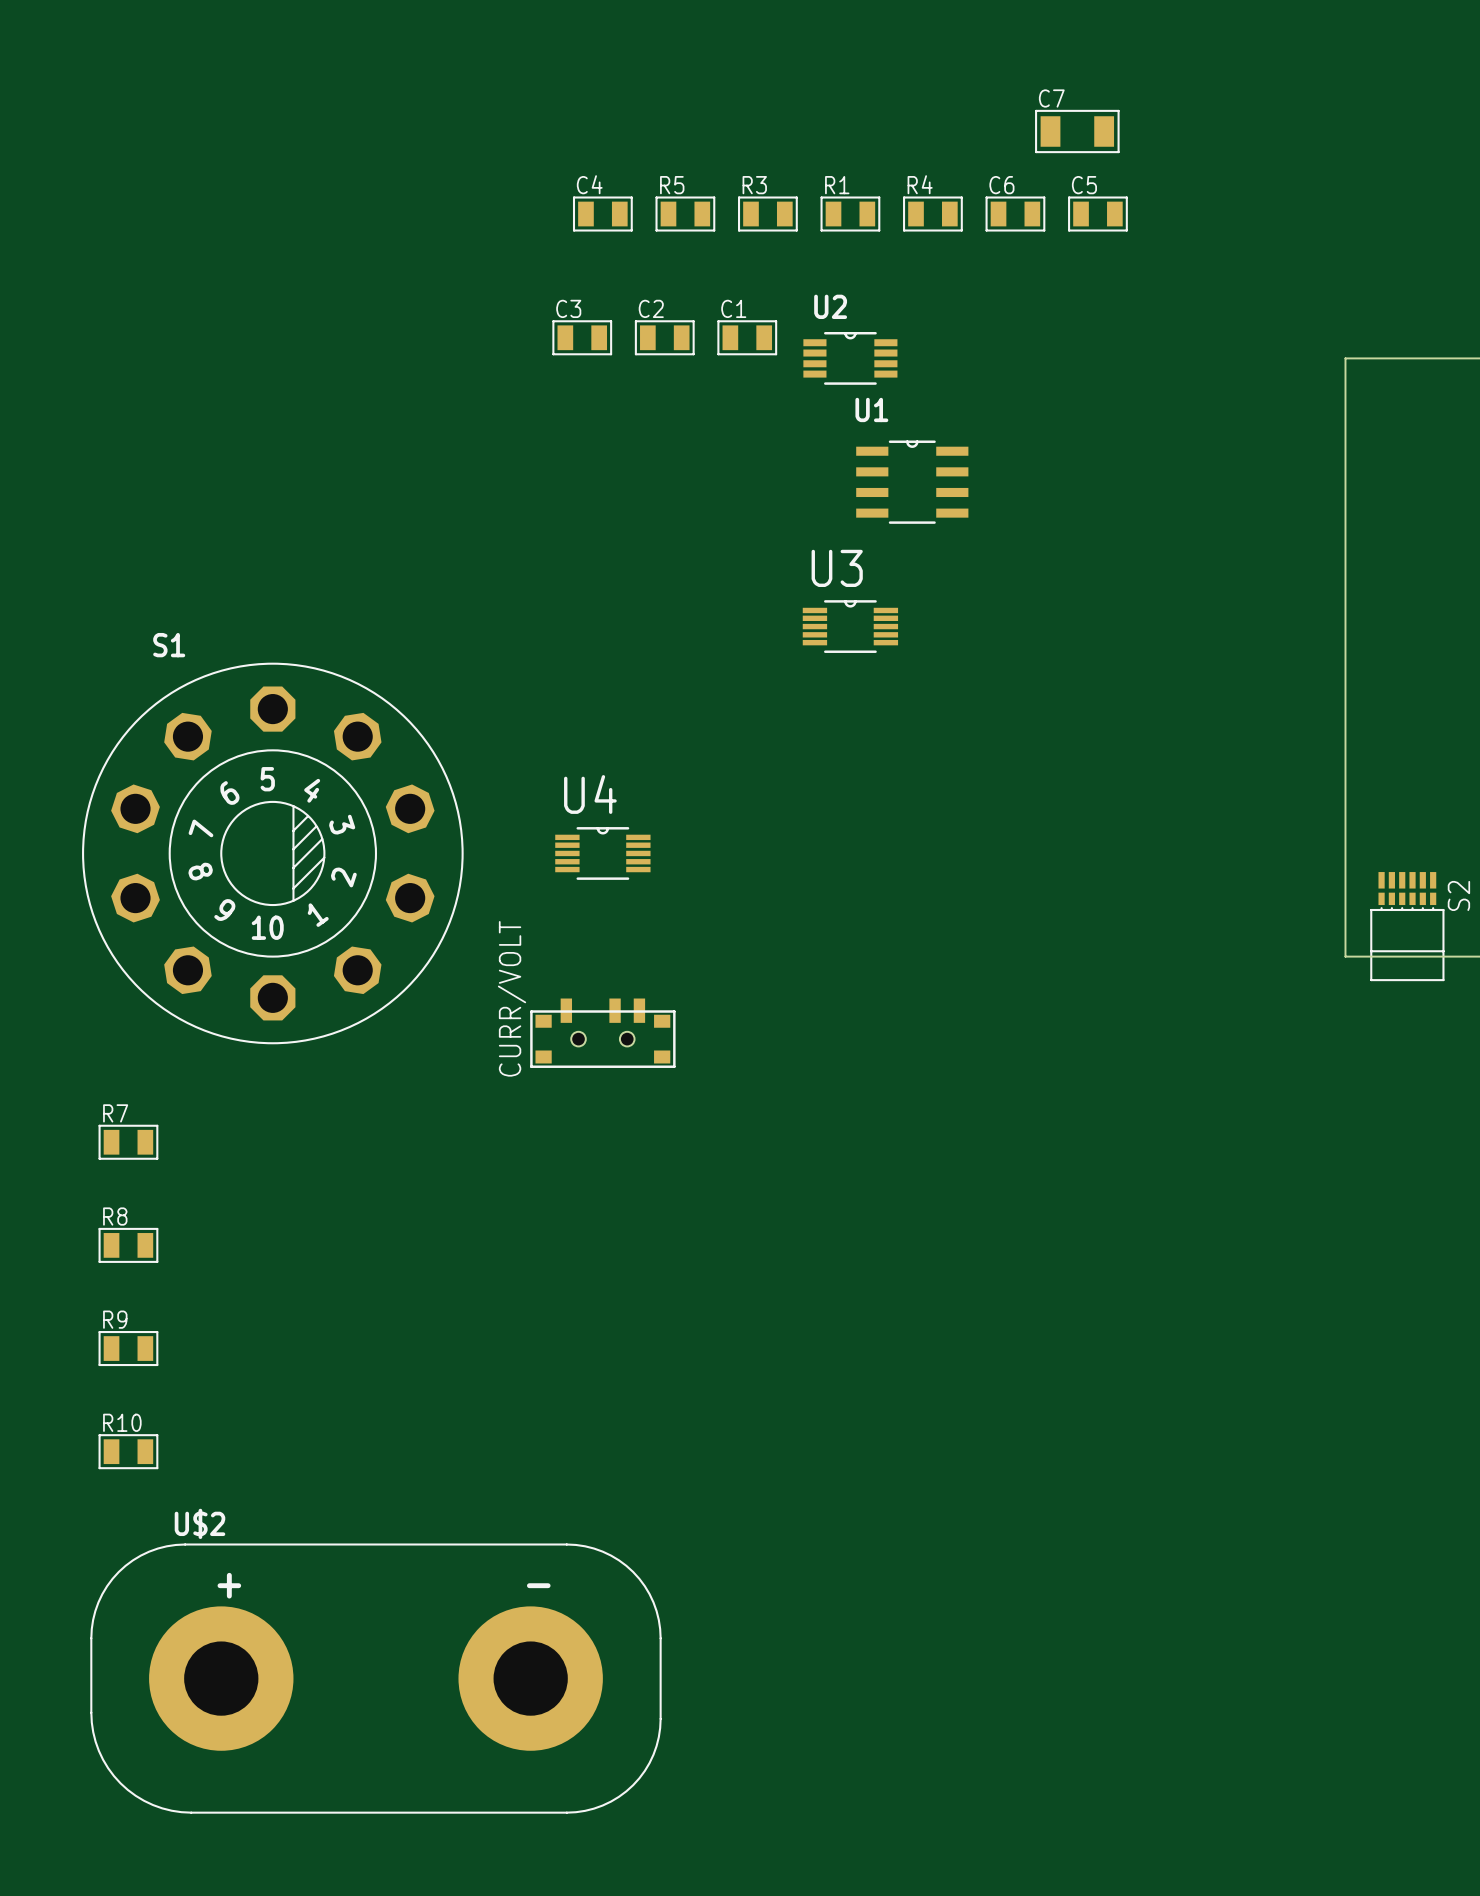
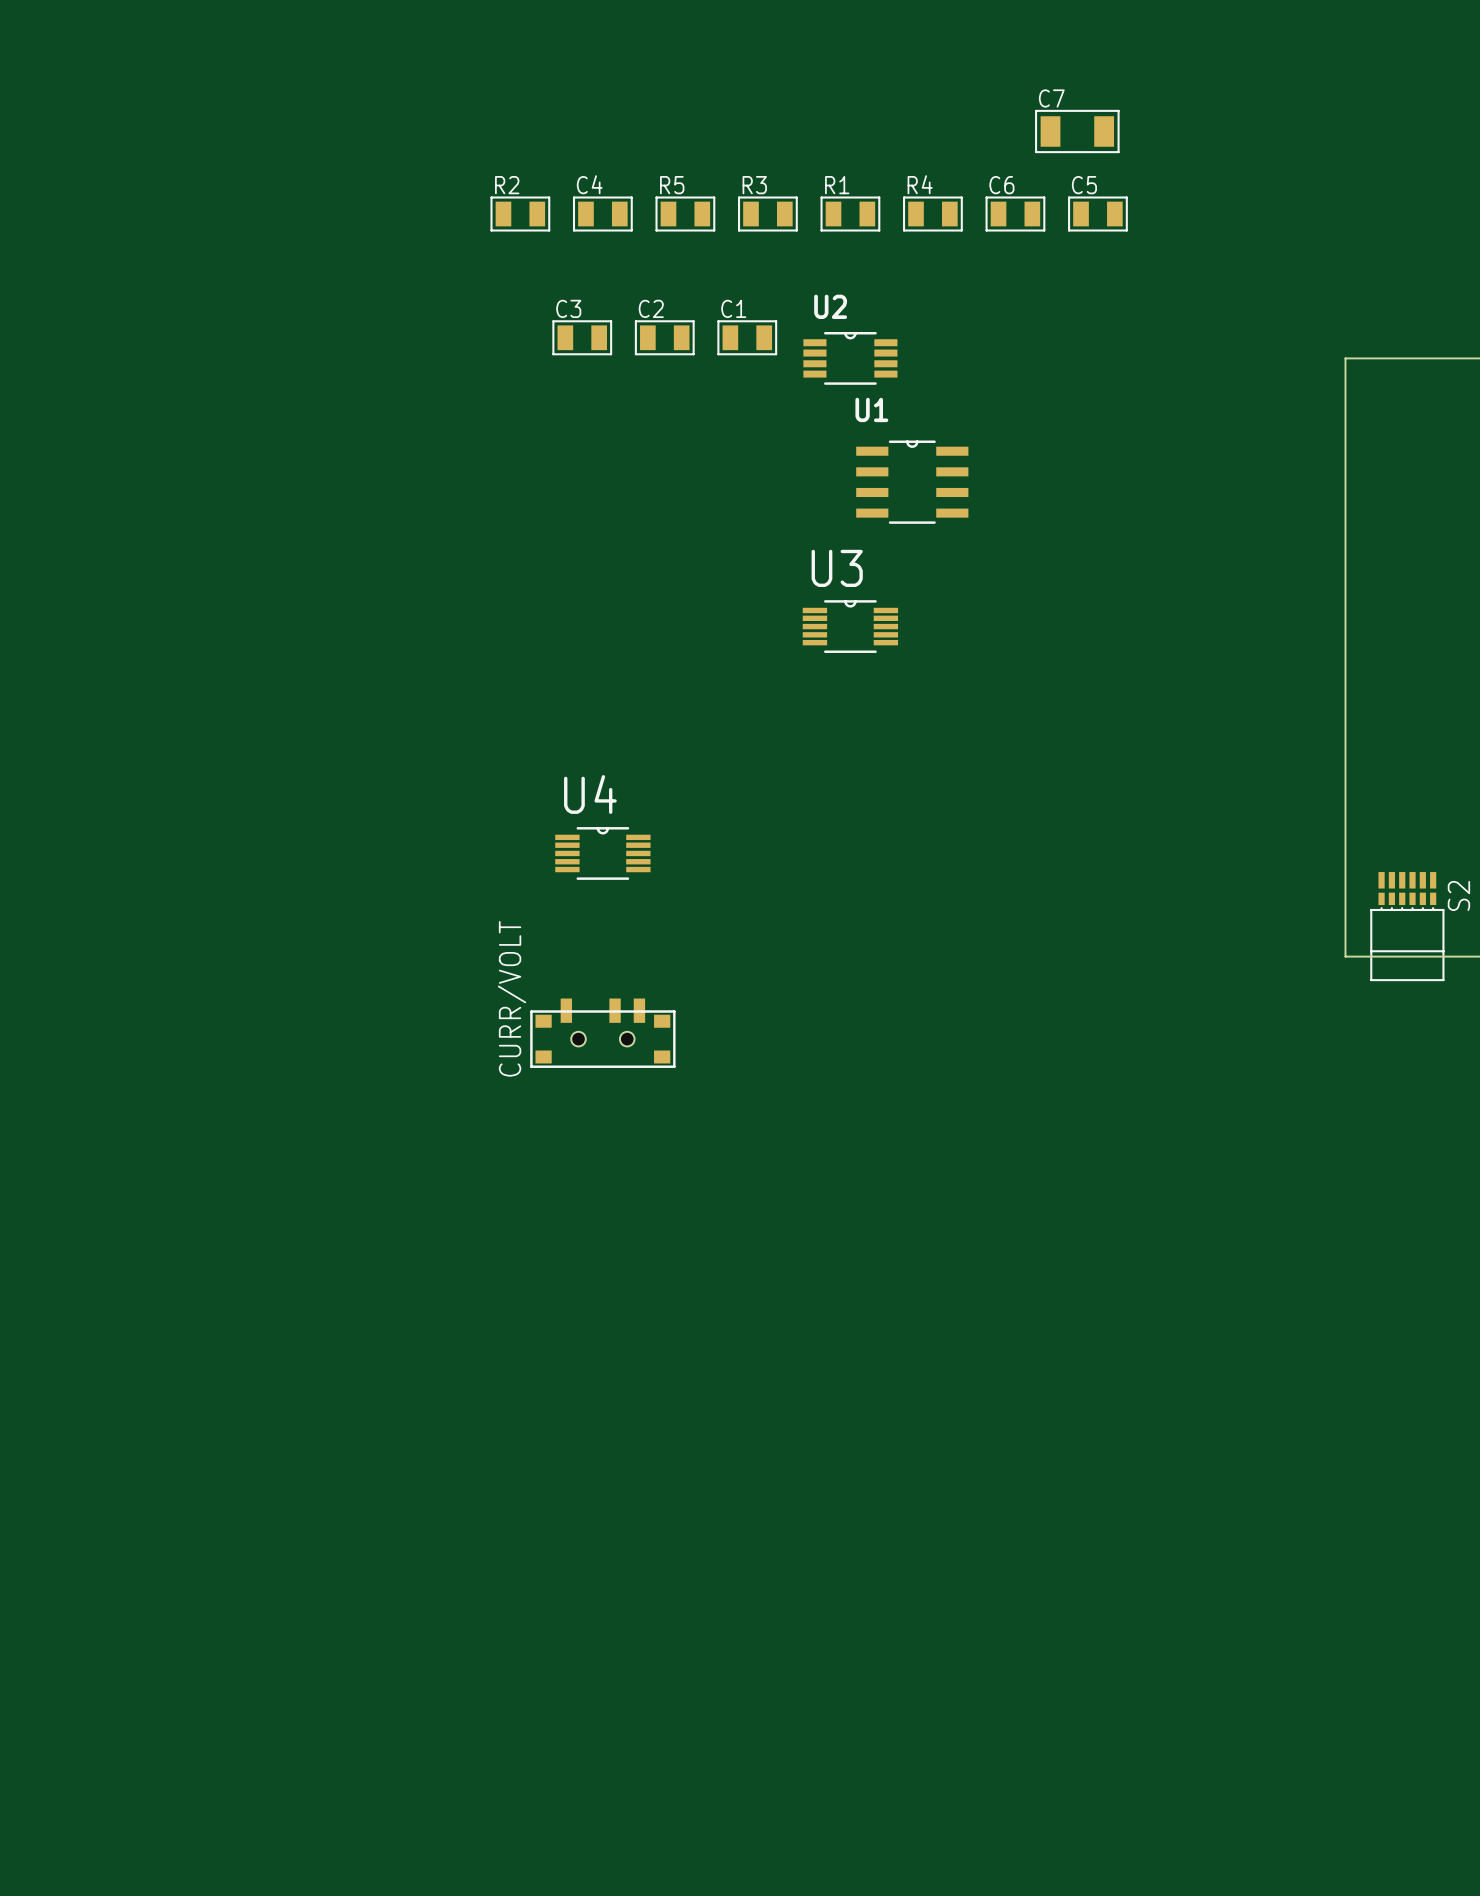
R2: none -> (520, 214)
S1: (272, 853) -> none
R7: (128, 1142) -> none
R8: (128, 1245) -> none
R9: (128, 1348) -> none
R10: (128, 1451) -> none
U$2: (375, 1678) -> none

